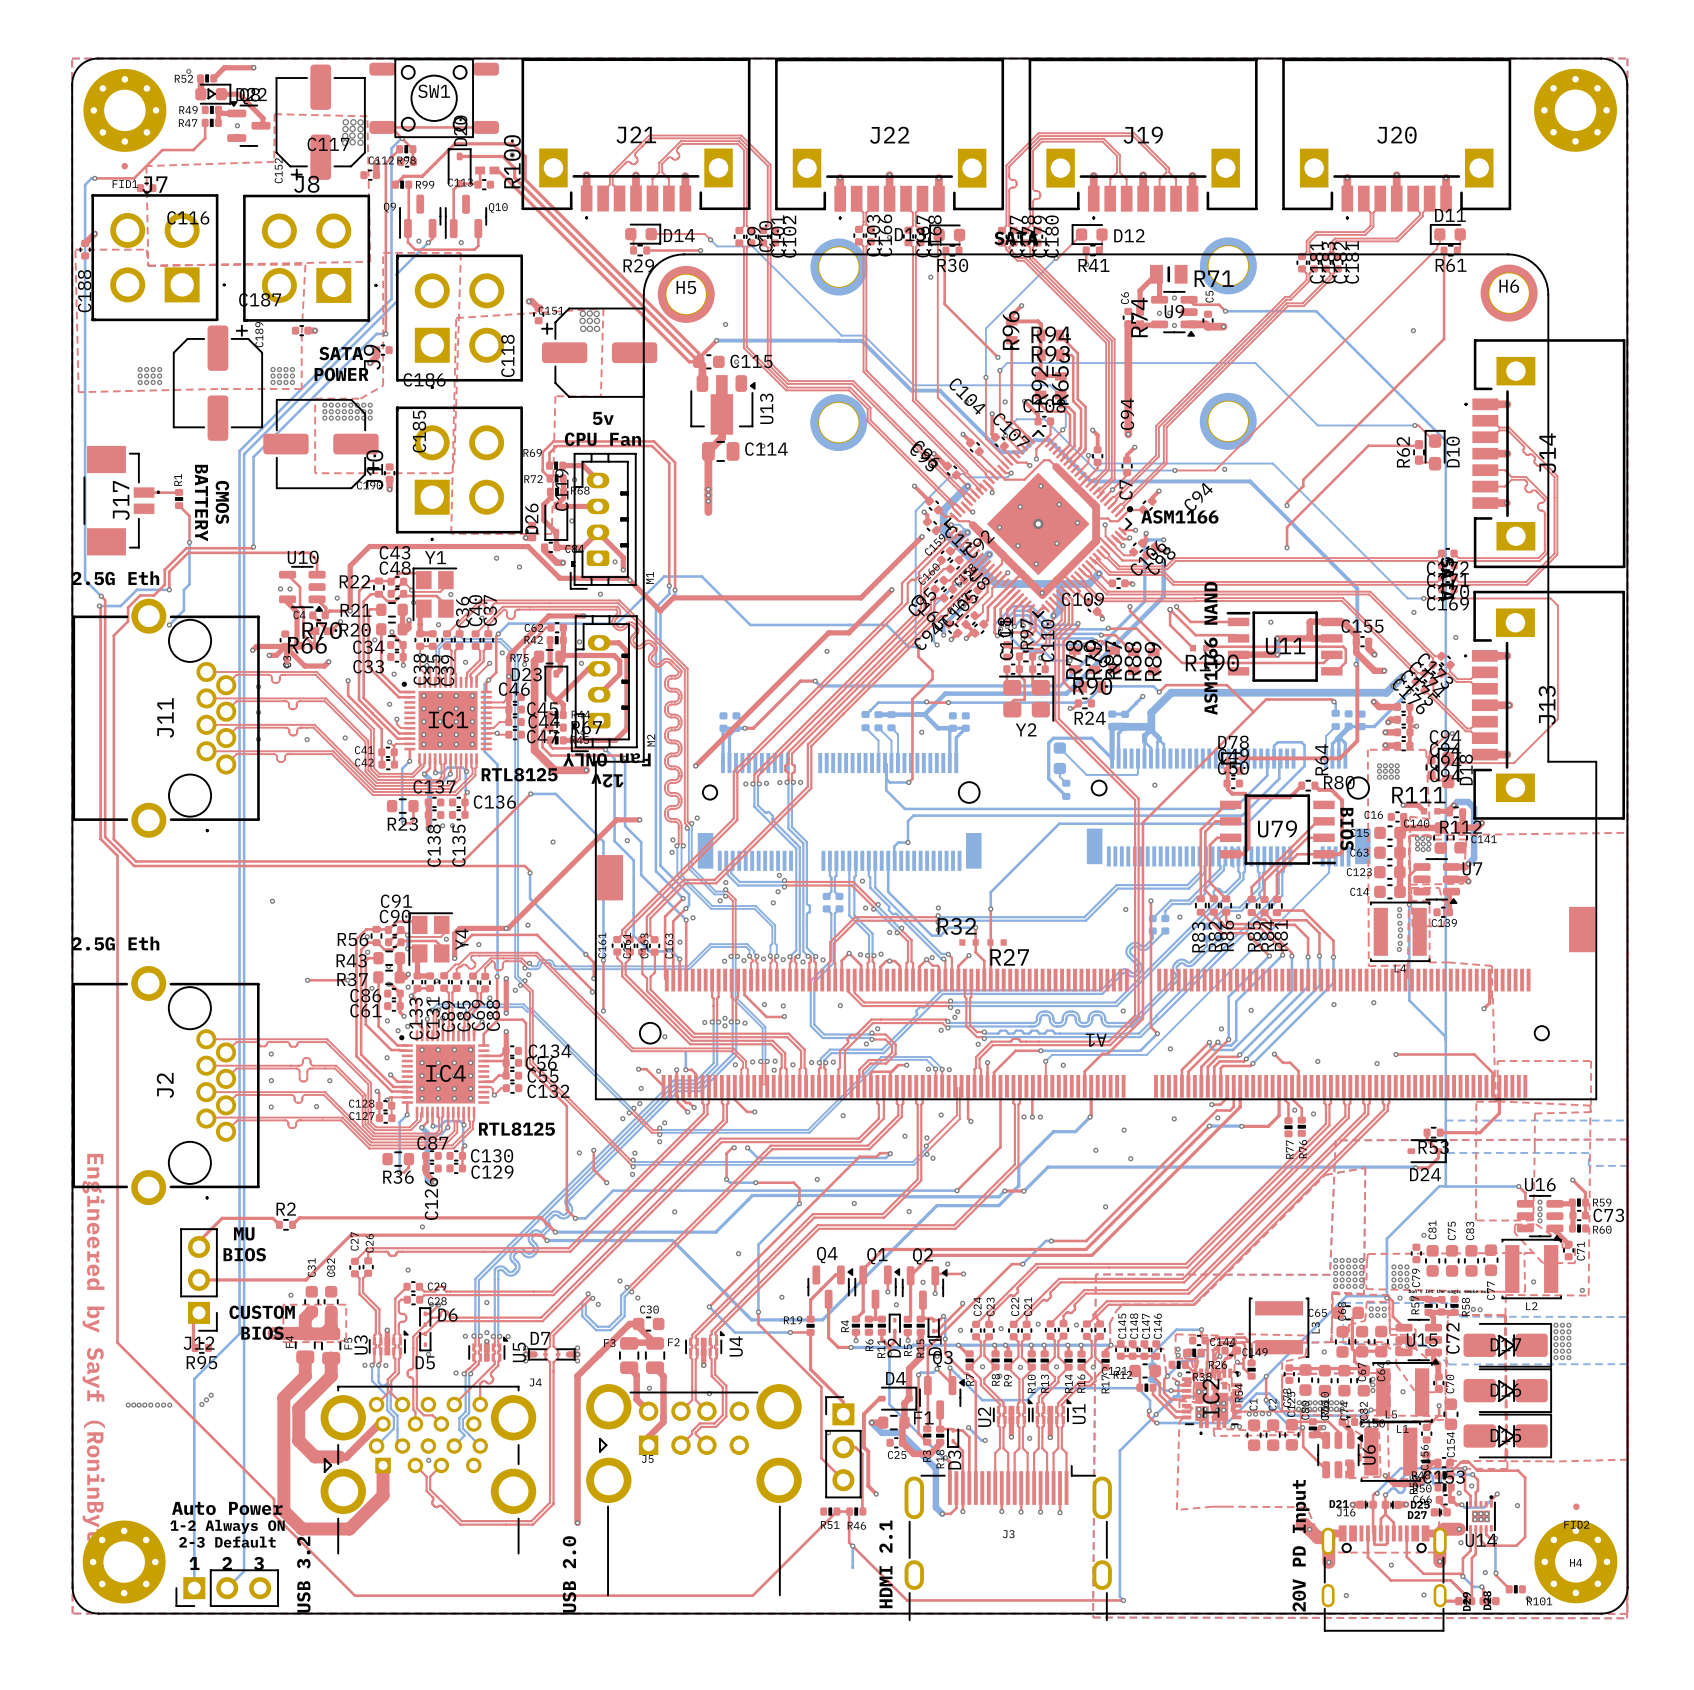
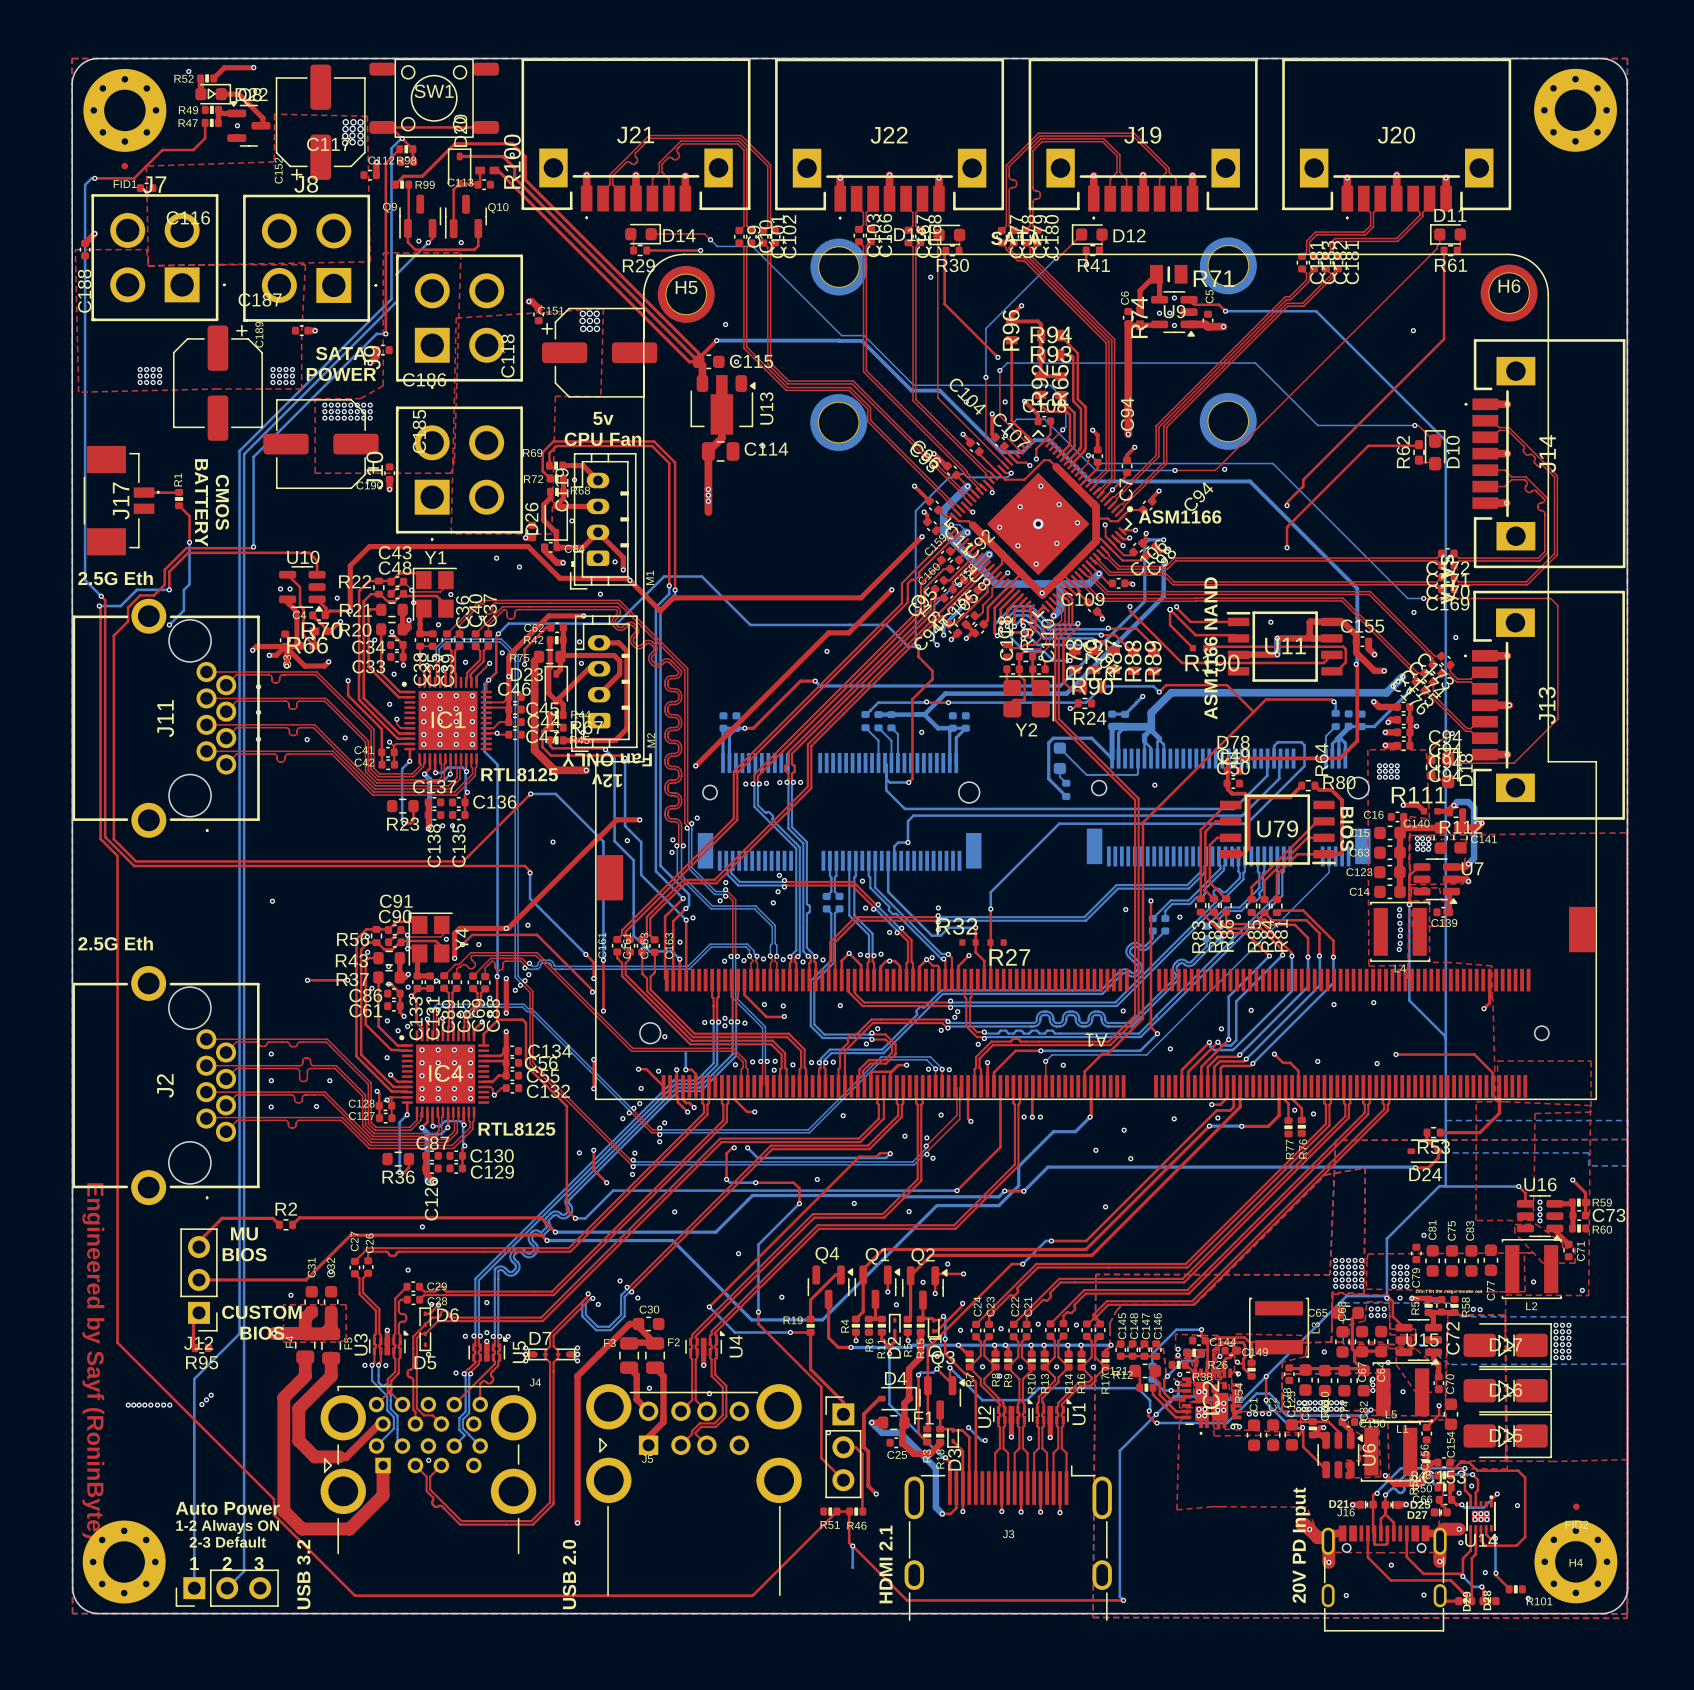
top track: none -> (593, 1059) (593, 1088)
via: none -> (593, 1059)
via: none -> (593, 1088)

